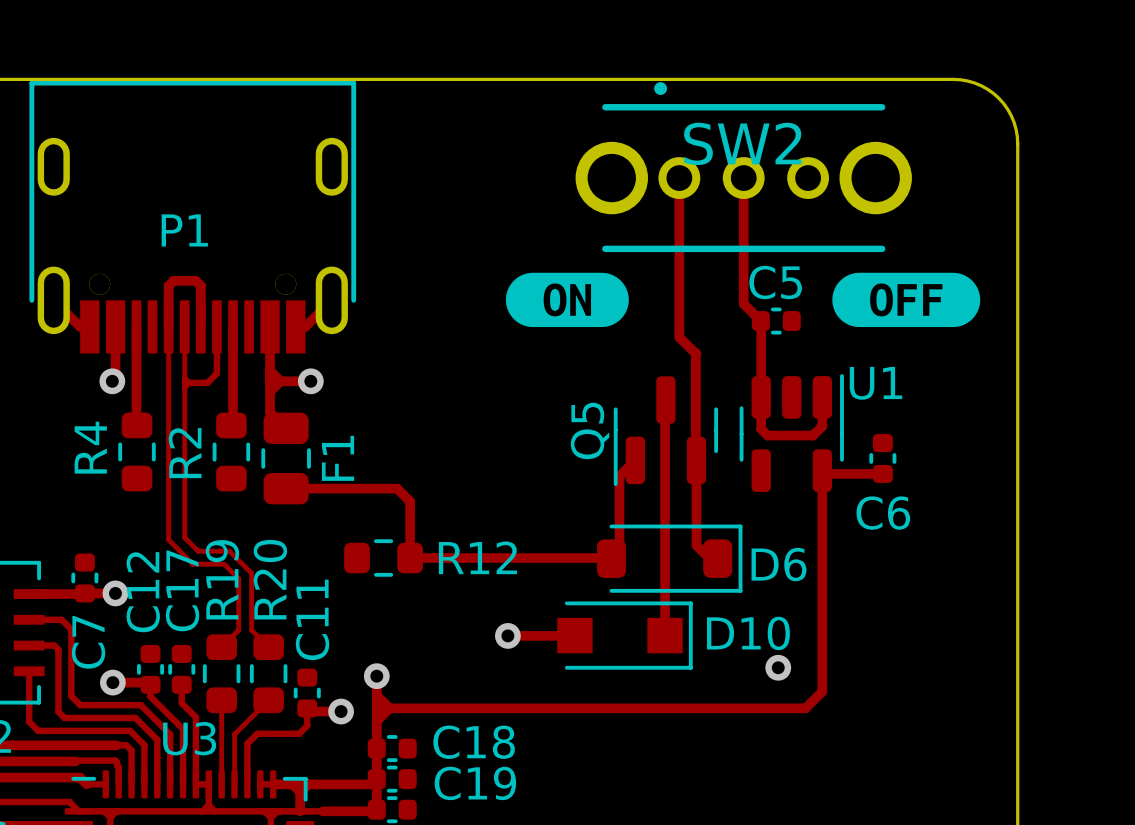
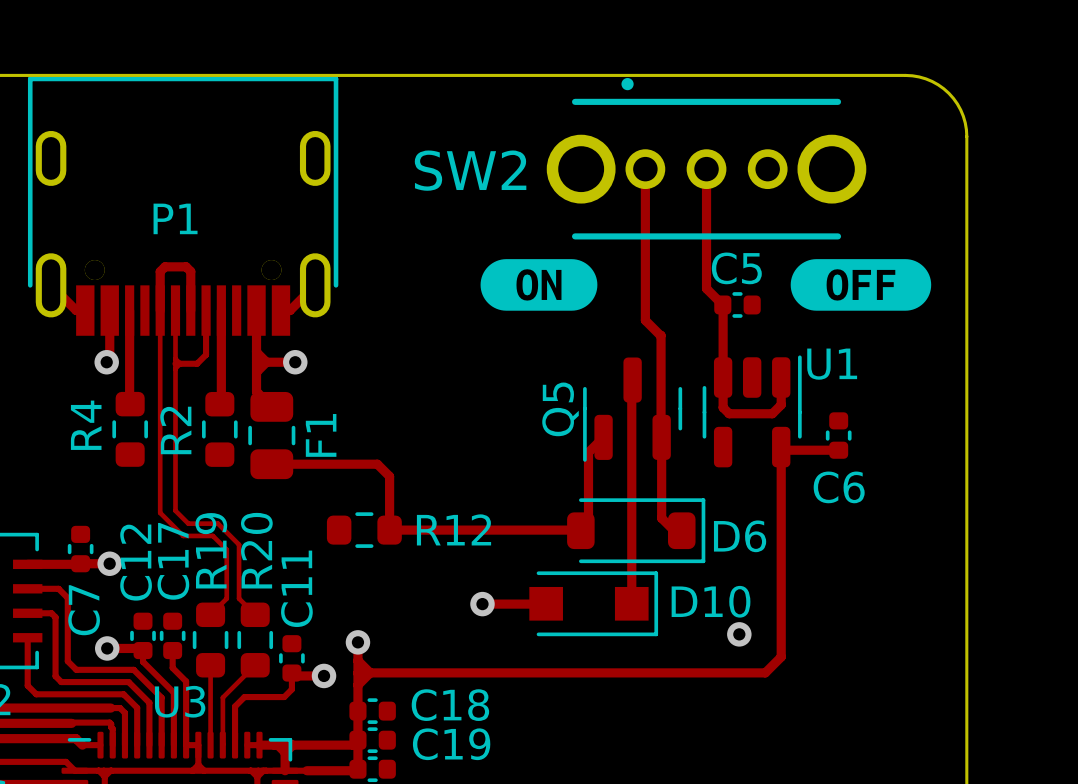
SW2 name position: SW2 (742, 143) -> SW2 (470, 170)

